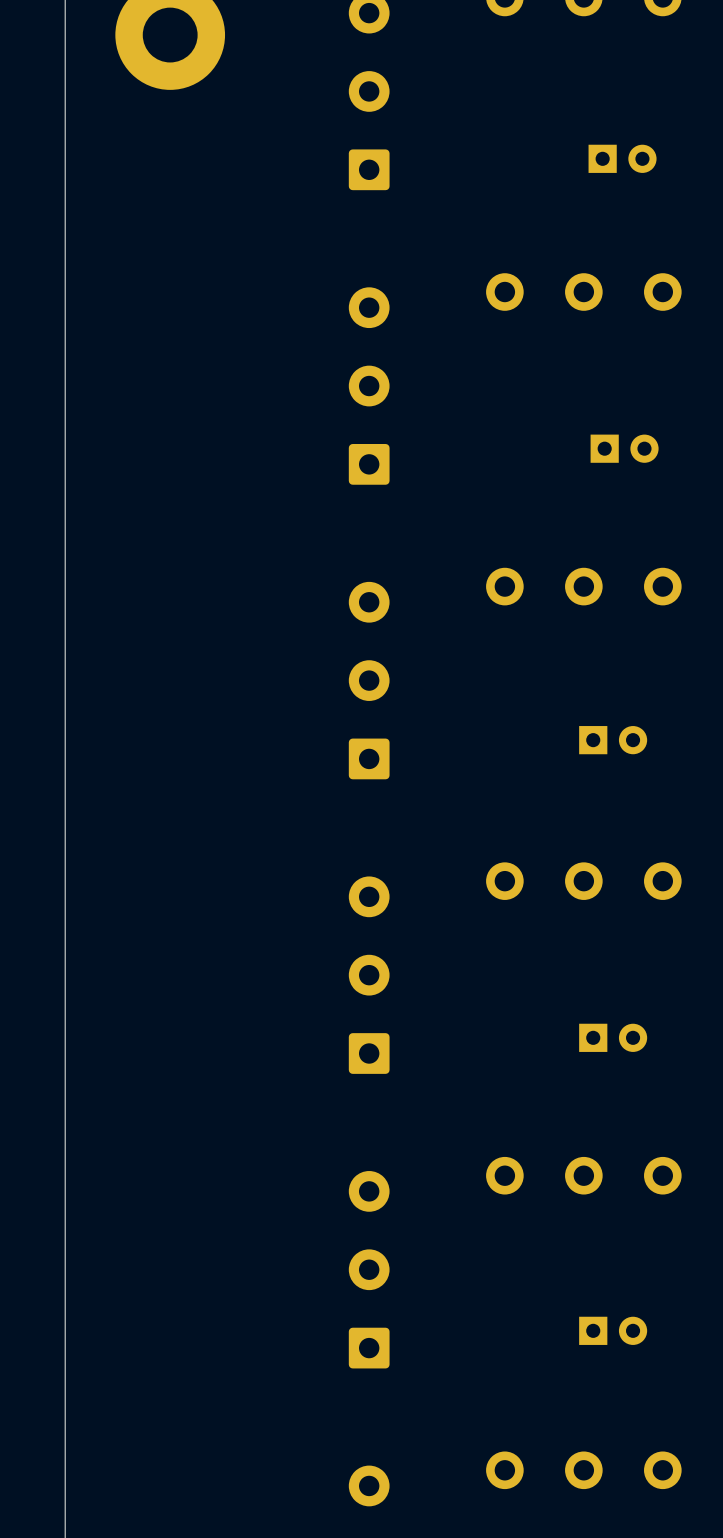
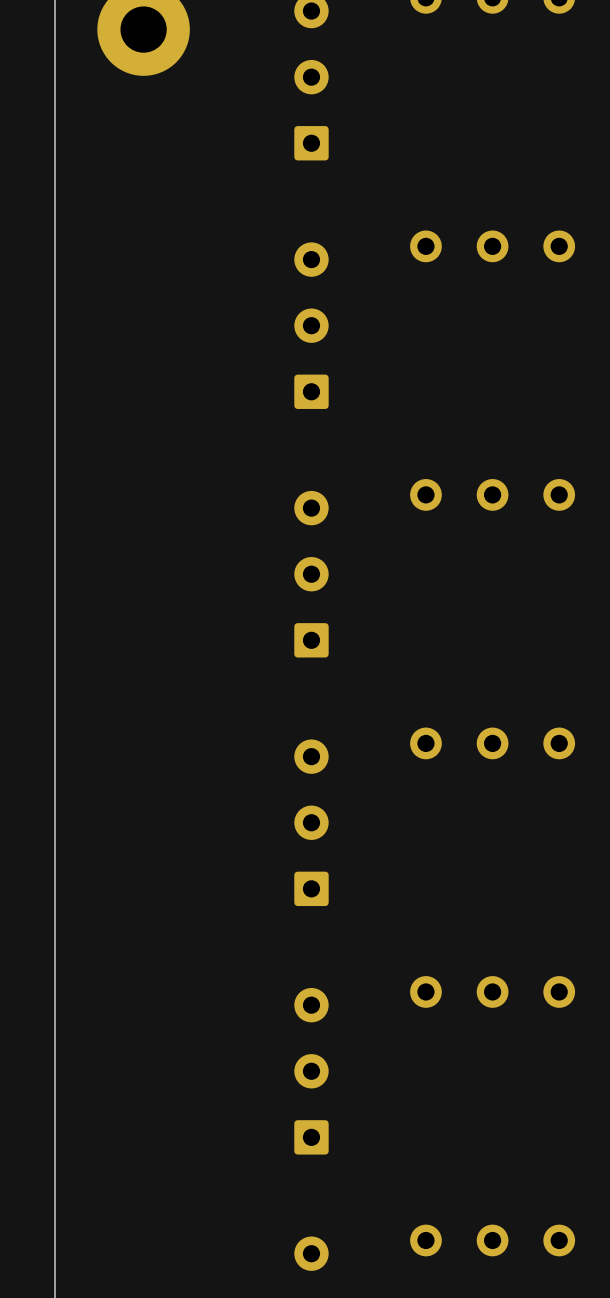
part: (622, 158) -> none
part: (624, 448) -> none
part: (613, 740) -> none
part: (613, 1037) -> none
part: (613, 1330) -> none

